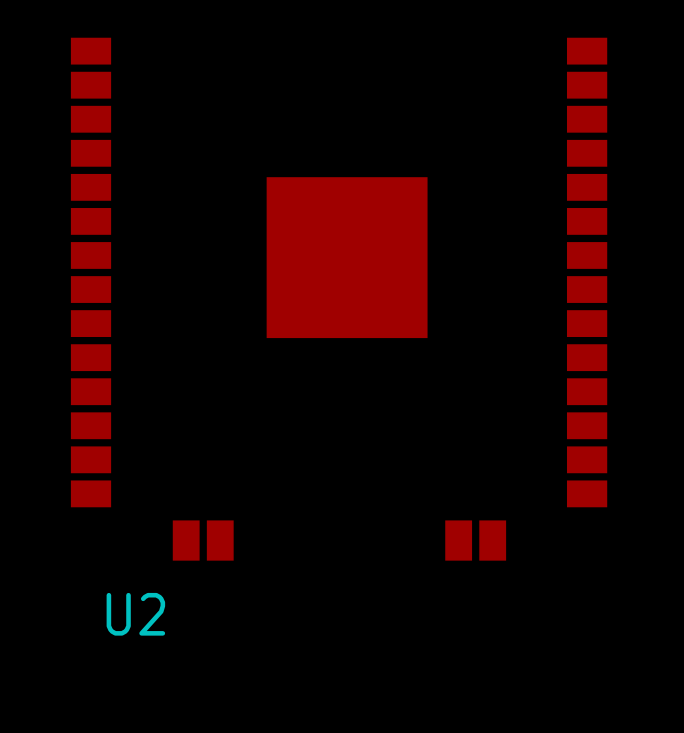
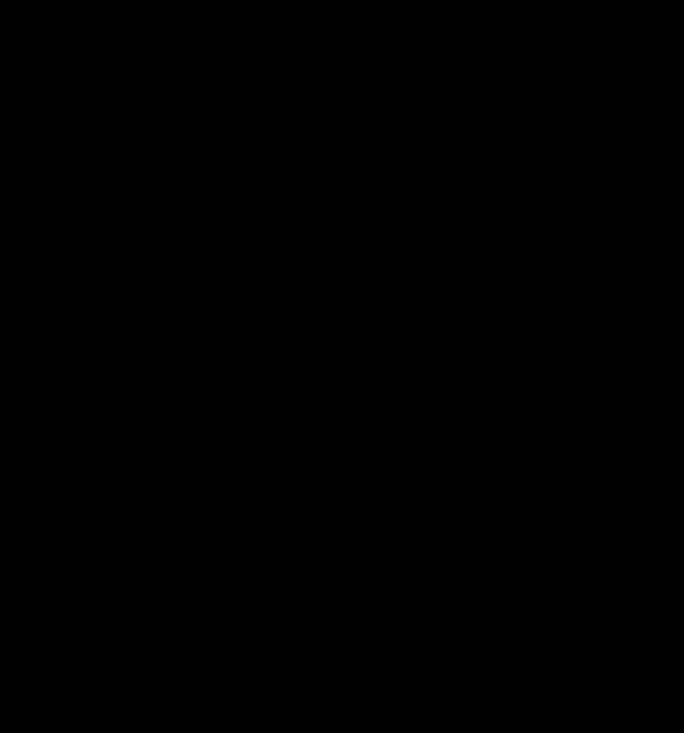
U2: (339, 299) -> none

